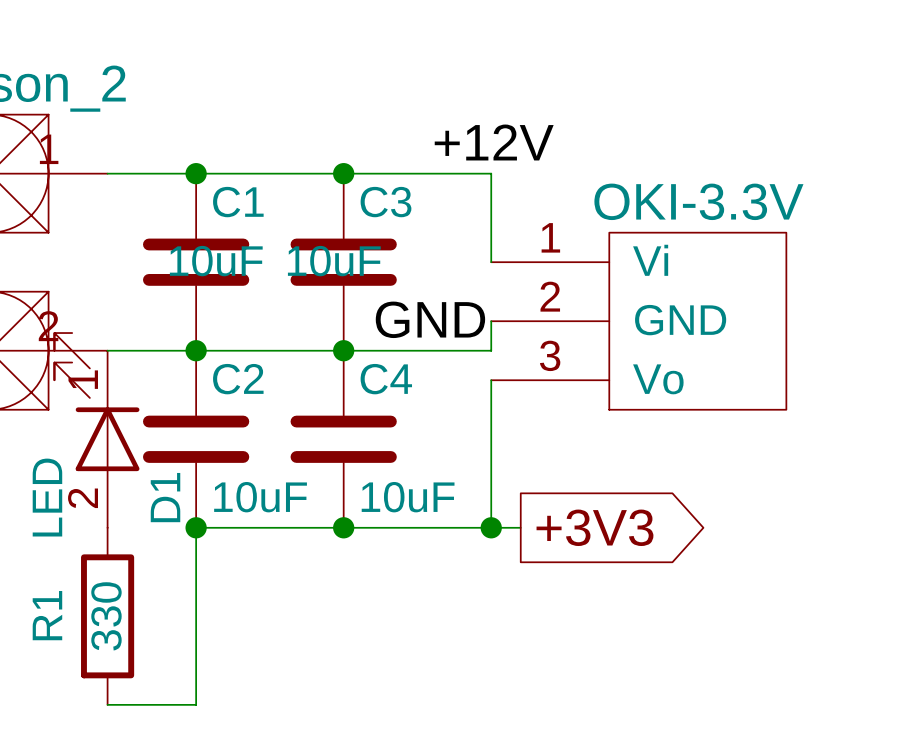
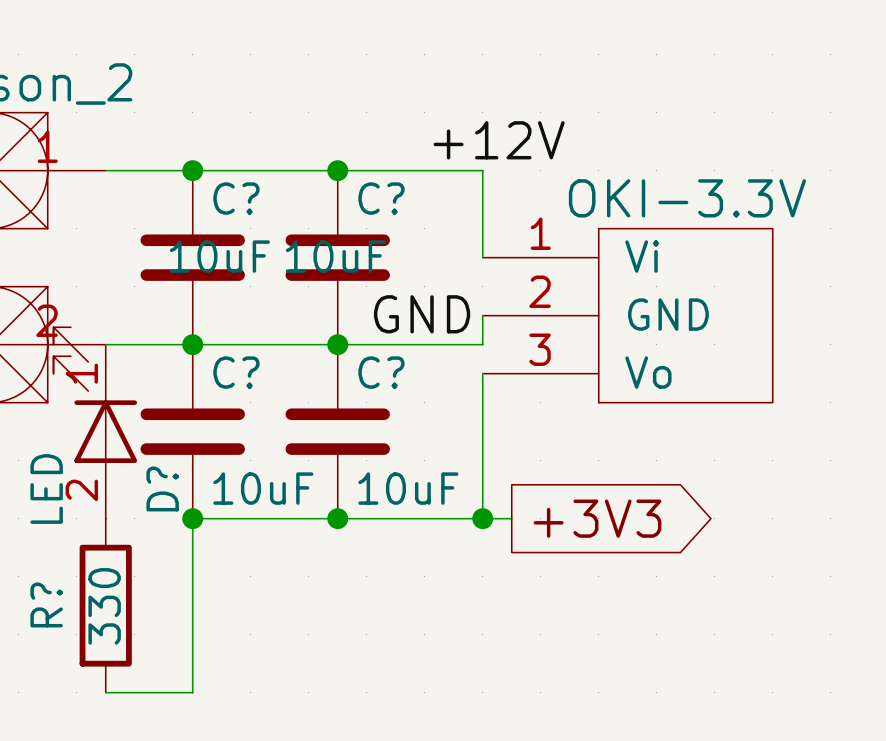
C1 name: C1 (238, 202) -> C? (236, 198)
C3 name: C3 (386, 202) -> C? (381, 198)
C2 name: C2 (238, 379) -> C? (236, 372)
C4 name: C4 (386, 379) -> C? (381, 372)
D1 name: D1 (165, 497) -> D? (162, 488)
R1 name: R1 (47, 615) -> R? (46, 604)

